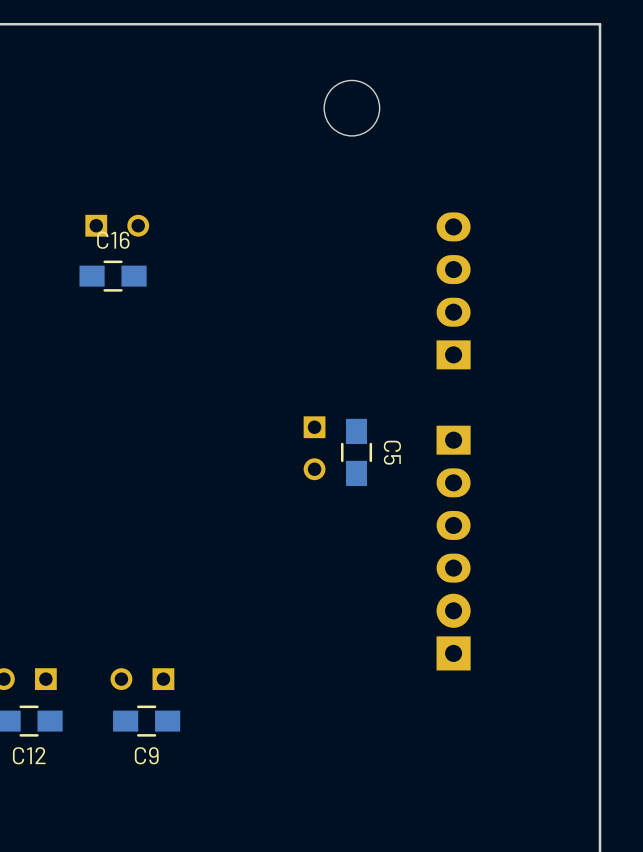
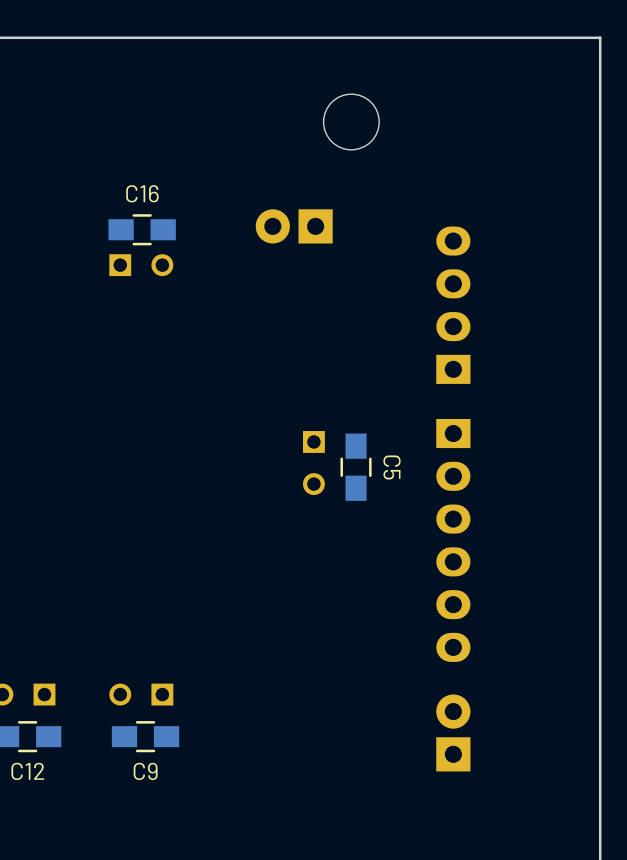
part: none -> (294, 226)
part position: (117, 225) -> (141, 265)
C16 position: (113, 276) -> (142, 229)
part: (453, 504) -> none
part: none -> (453, 540)
part position: (453, 632) -> (453, 732)

